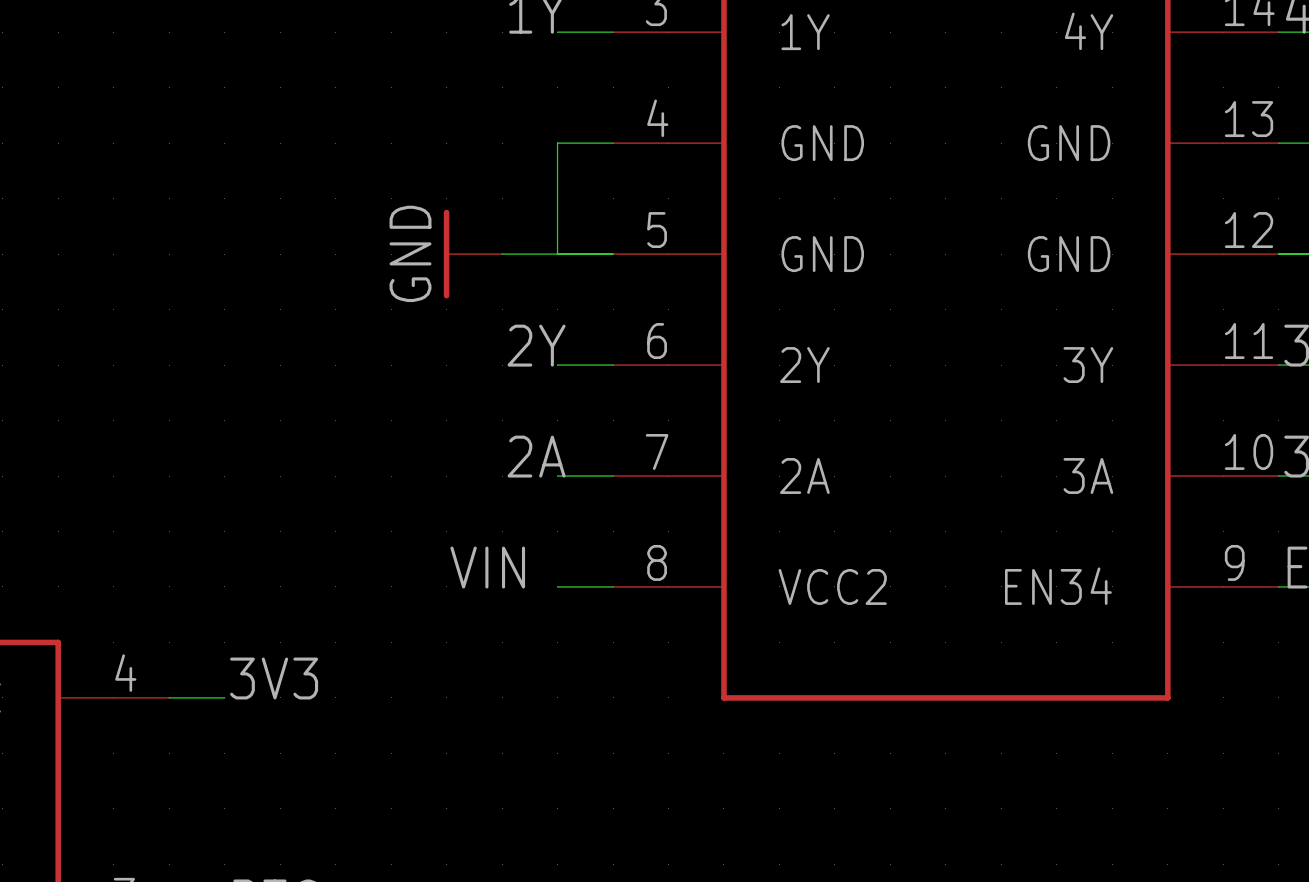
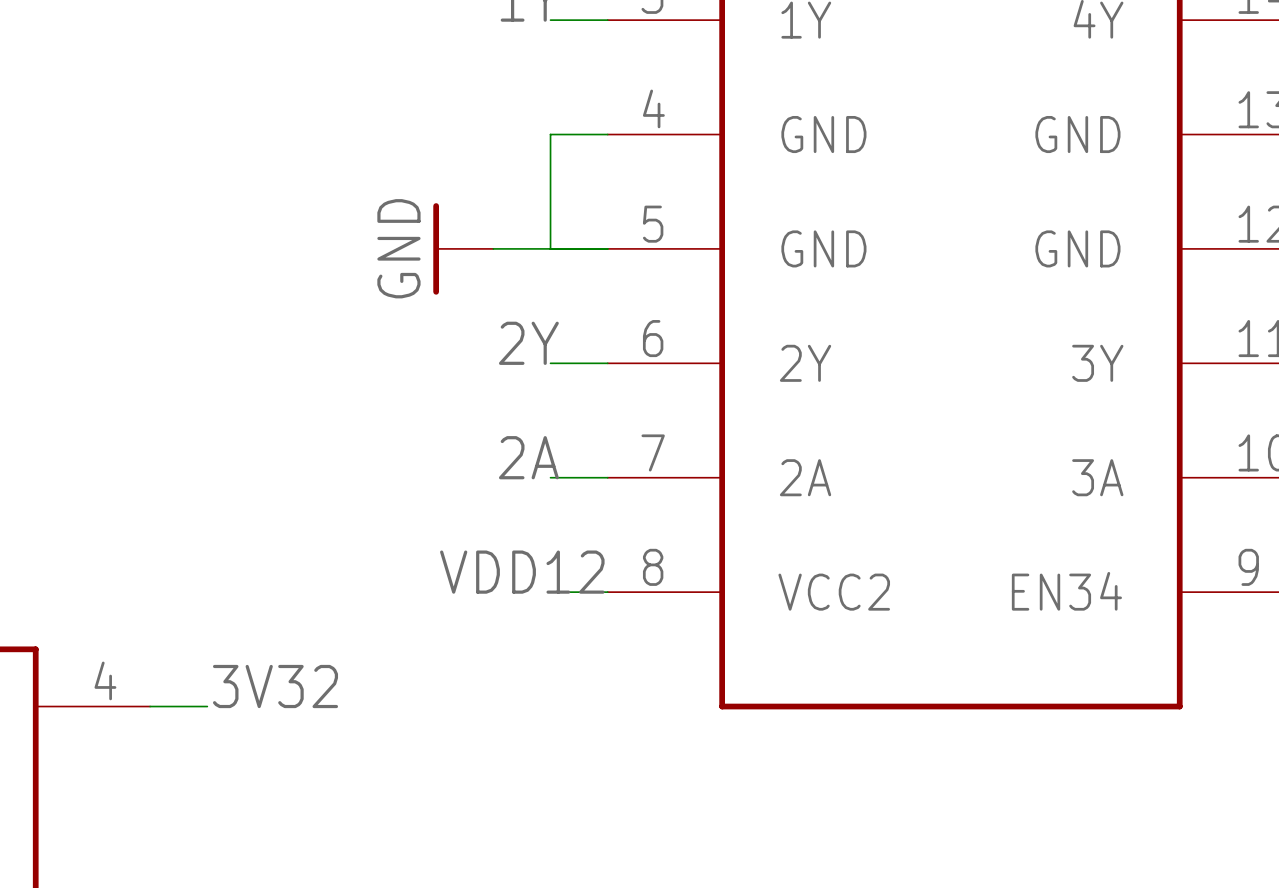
label: VIN (487, 567) -> VDD12 (522, 572)
label: 3V3 (274, 678) -> 3V32 (275, 686)

